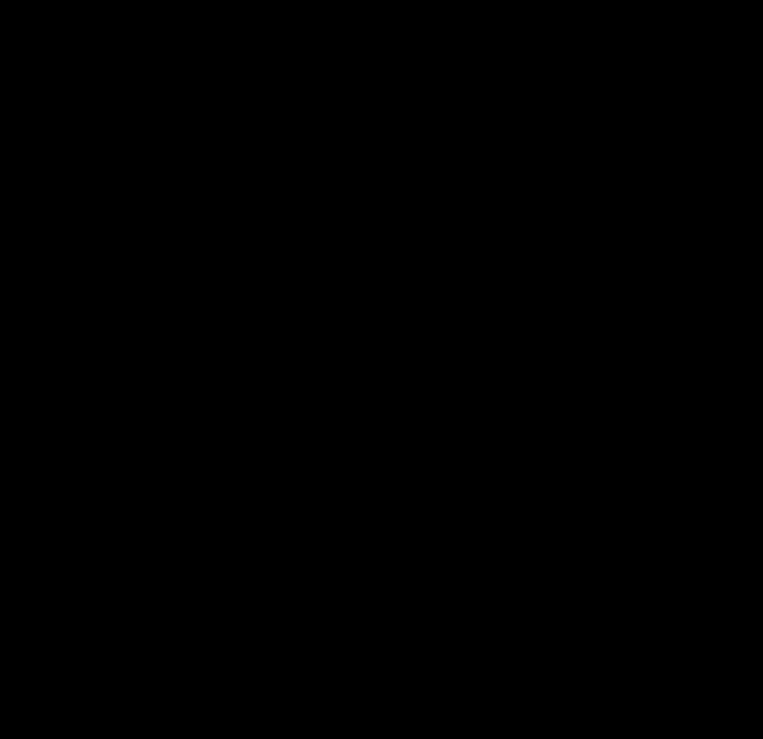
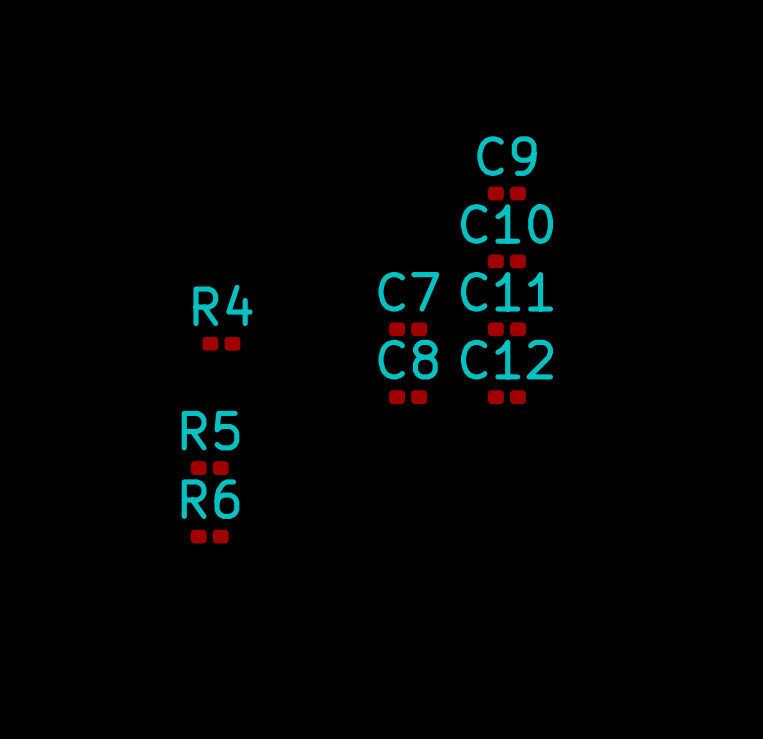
C9: none -> (506, 193)
C10: none -> (506, 261)
C7: none -> (408, 329)
C11: none -> (506, 329)
R4: none -> (221, 343)
C8: none -> (408, 397)
C12: none -> (506, 397)
R5: none -> (209, 468)
R6: none -> (209, 536)

